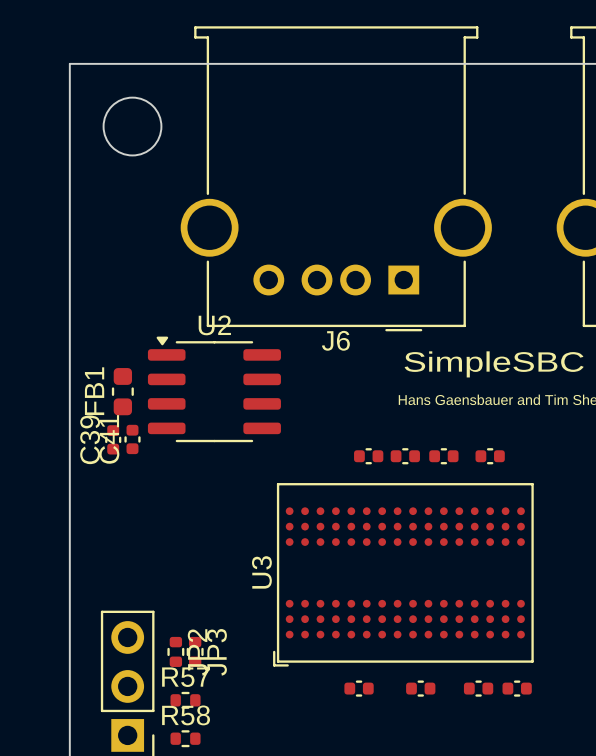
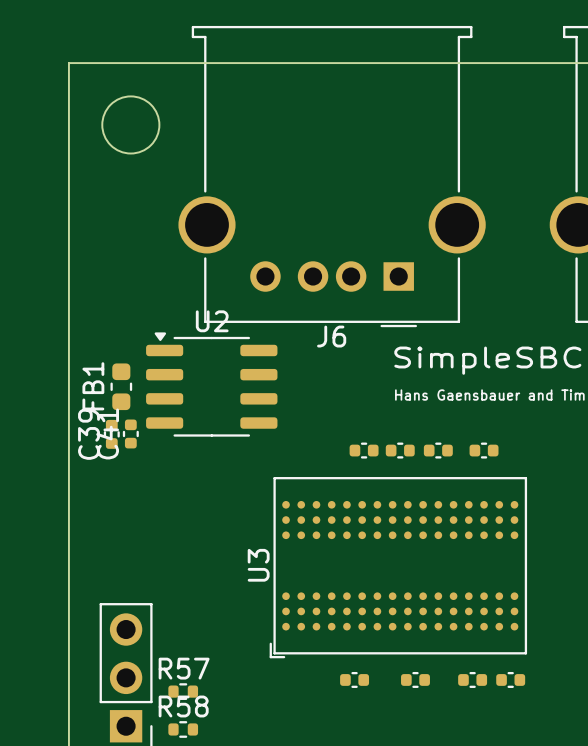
JP2: (175, 651) -> none
JP3: (195, 651) -> none

